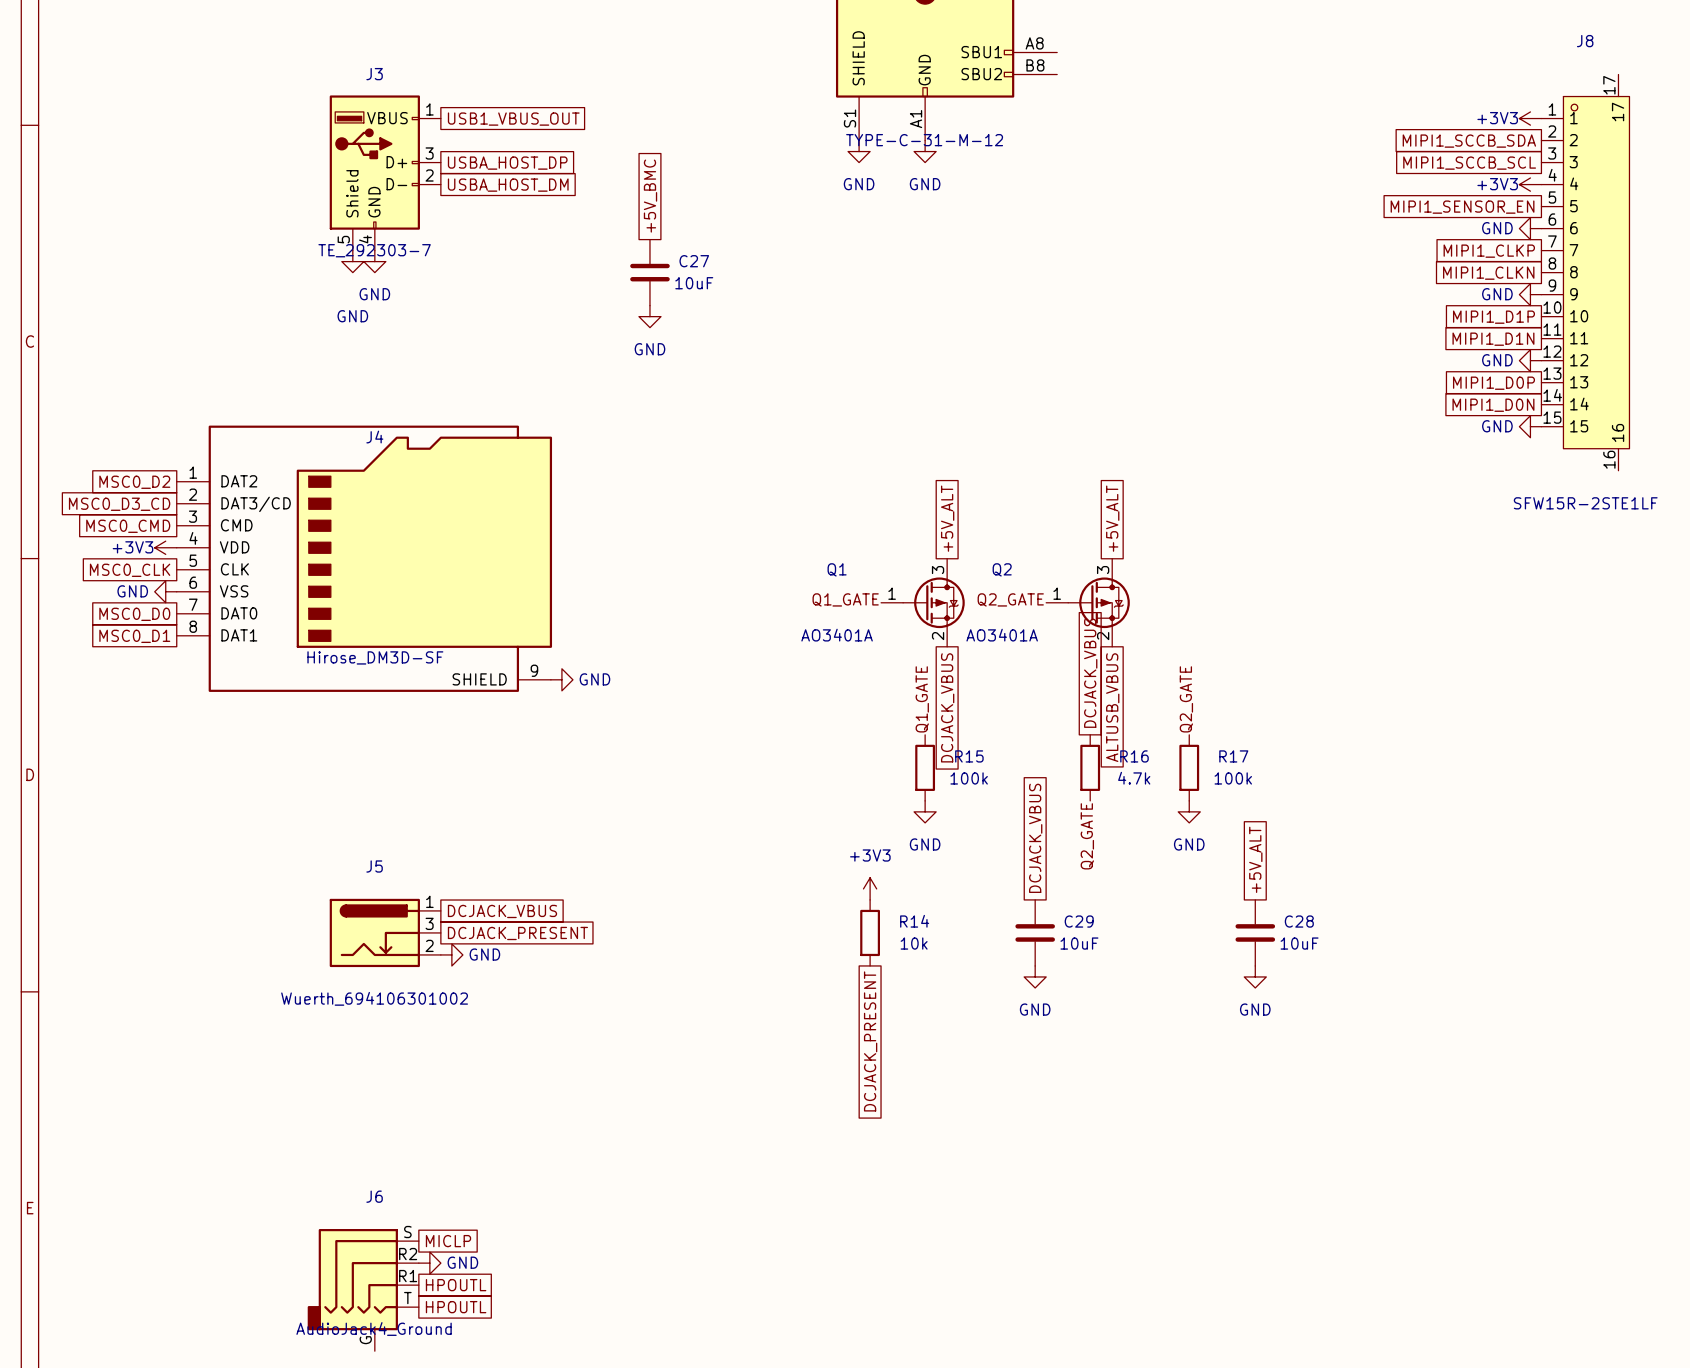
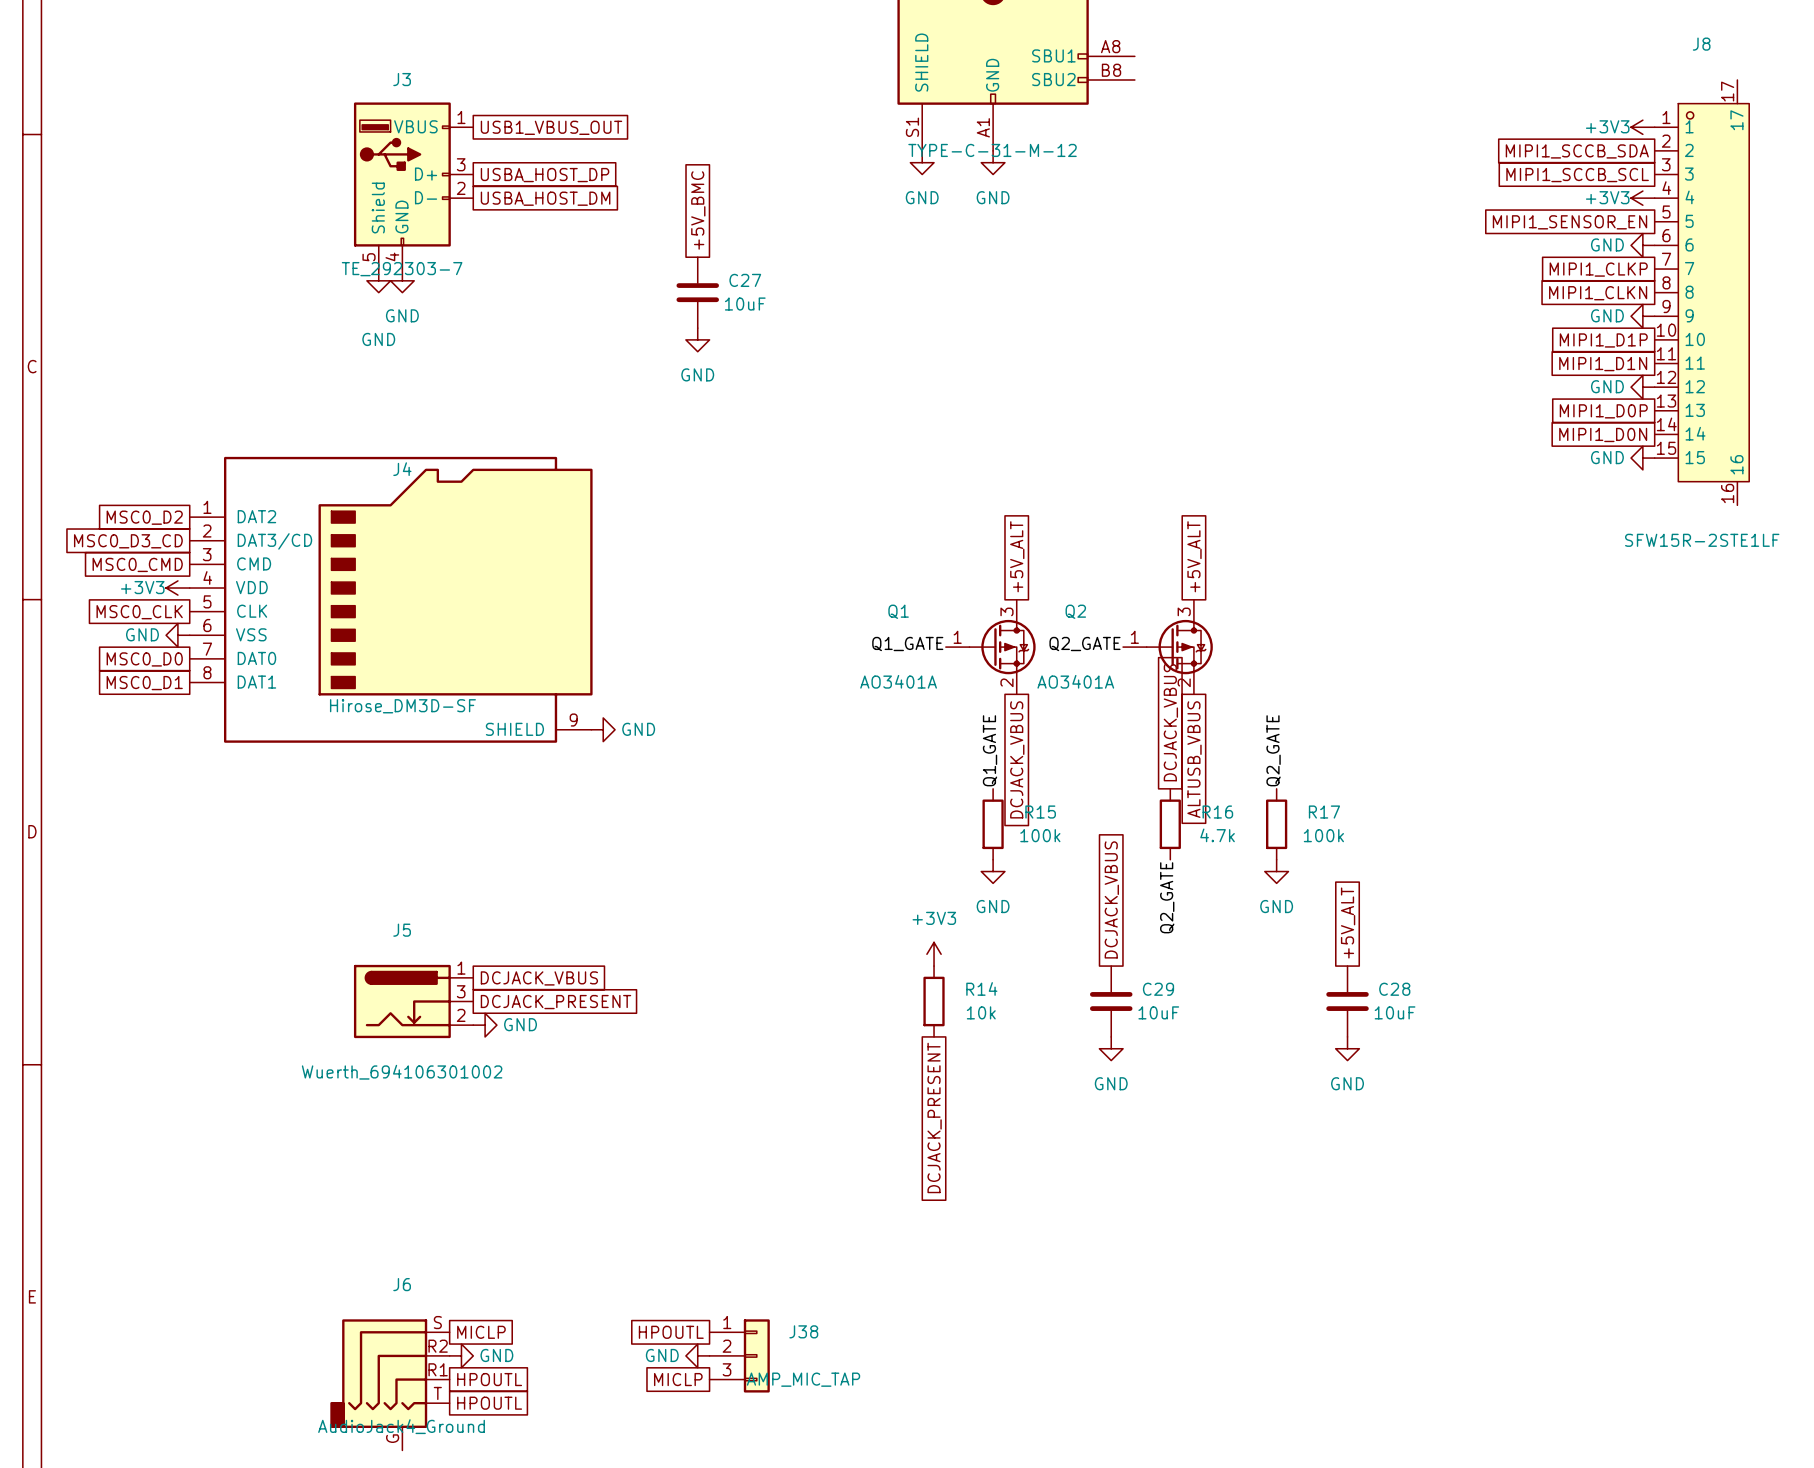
global label: none -> HPOUTL (671, 1332)
power symbol: none -> GND (697, 1355)
J38: none -> AMP_MIC_TAP (739, 1355)
global label: none -> MICLP (678, 1379)

